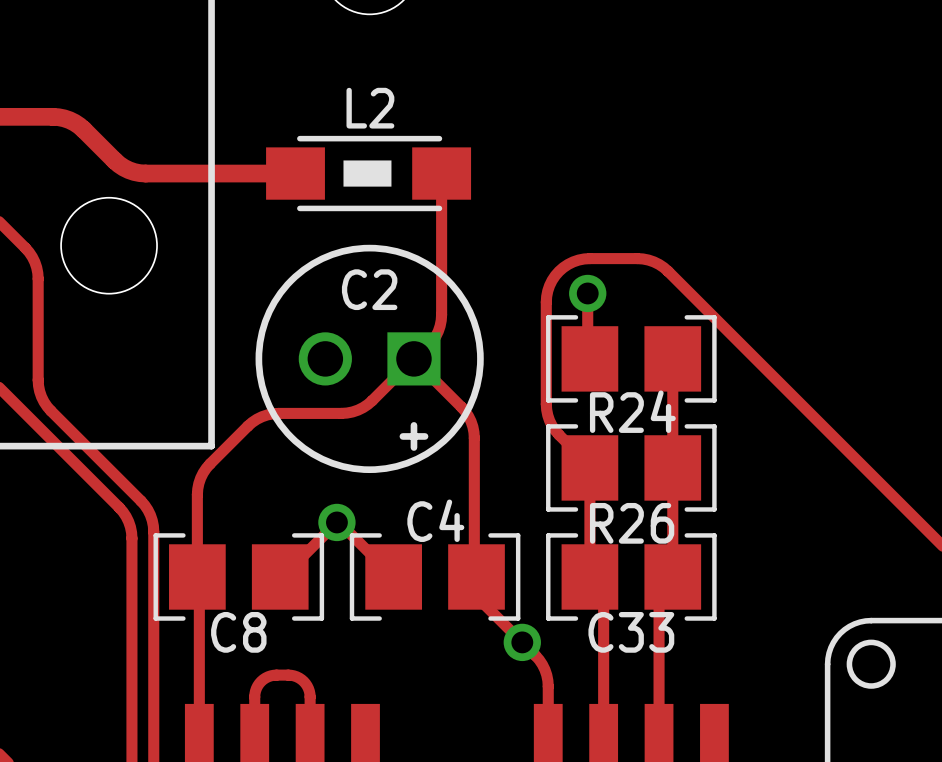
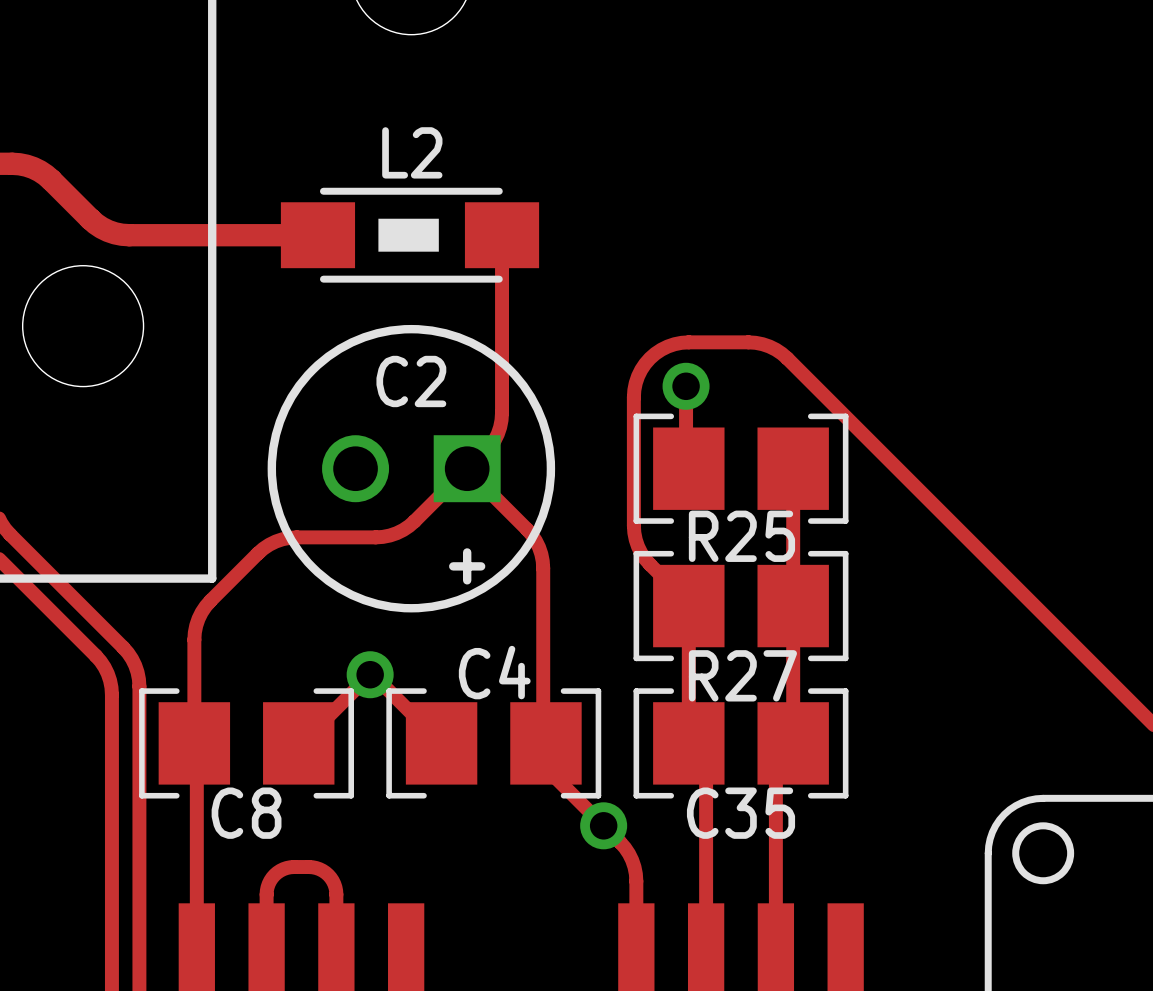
R24 name: R24 (632, 411) -> R25 (741, 536)
R26 name: R26 (632, 523) -> R27 (742, 675)
C33 name: C33 (631, 632) -> C35 (741, 813)

